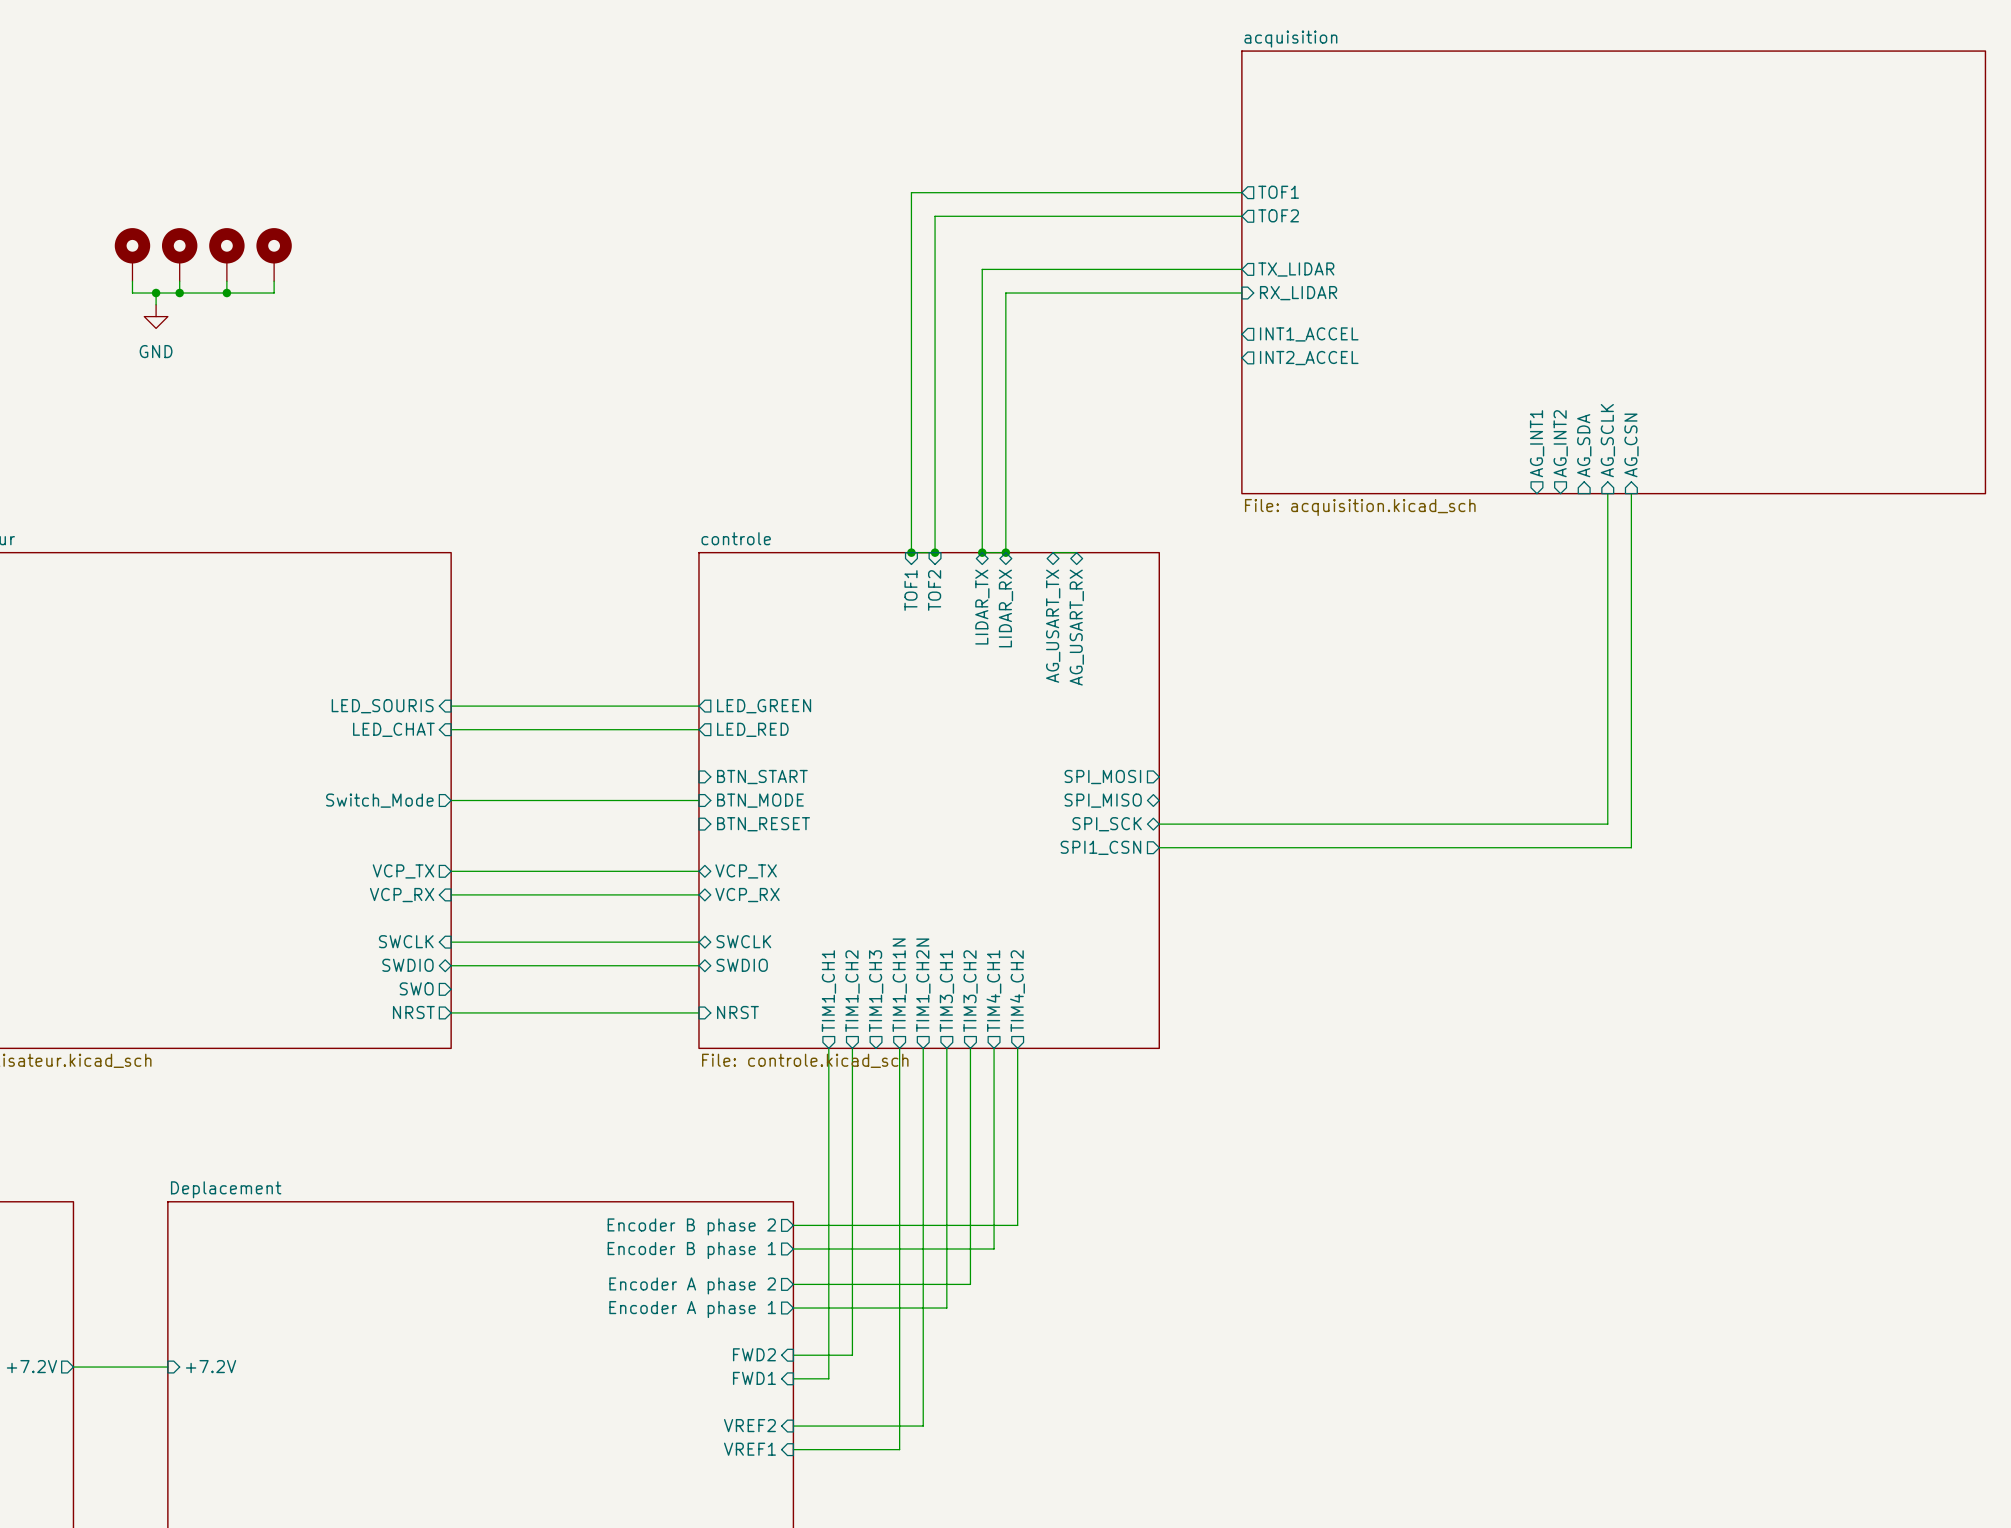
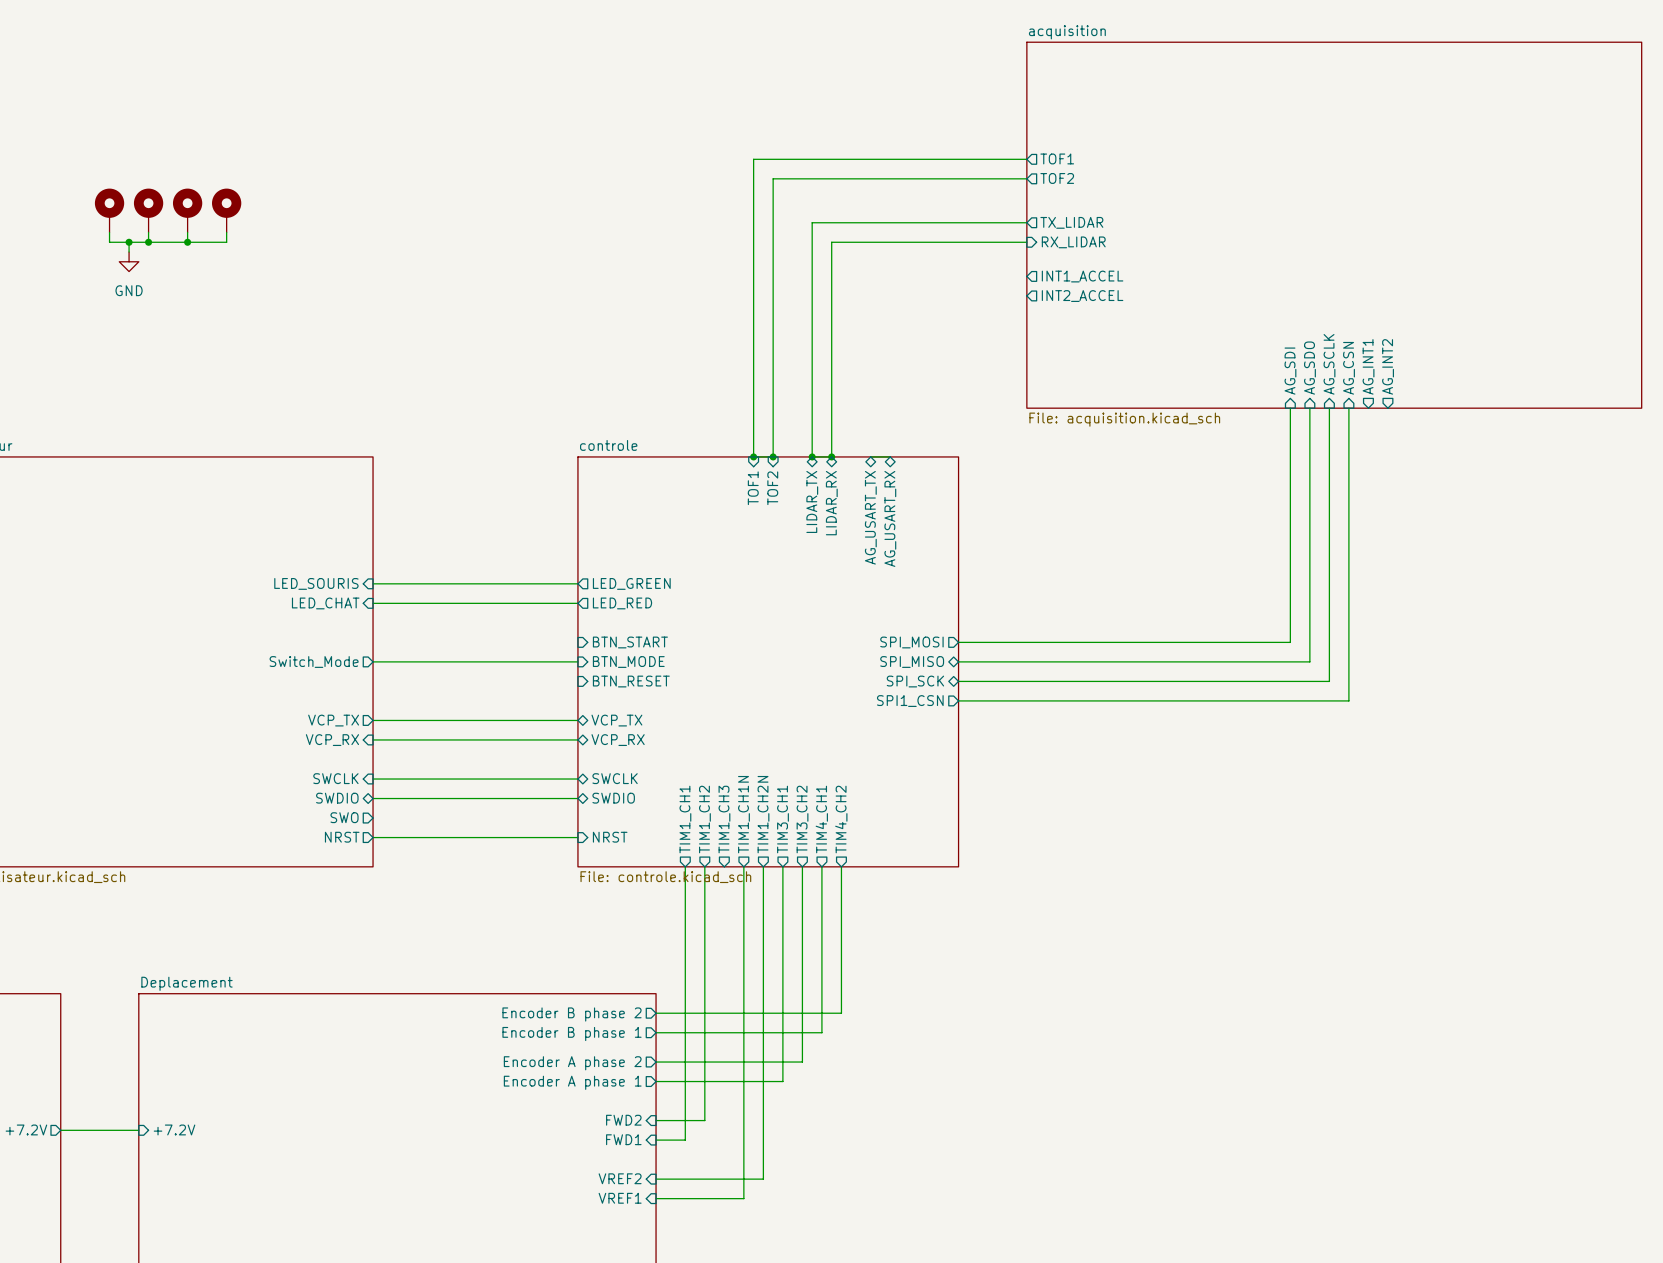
sheet pin position: AG_INT1 (1537, 443) -> AG_INT1 (1368, 366)
sheet pin shape: output (1560, 443) -> input (1290, 371)
sheet pin: AG_INT2 (1560, 443) -> AG_SDI (1290, 371)
sheet pin: none -> AG_INT2 (1388, 366)
sheet pin: AG_SDA (1584, 445) -> AG_SDO (1309, 368)
wire: none -> (1290, 408) (1290, 642) (958, 642)
wire: none -> (1309, 408) (1309, 661) (958, 661)

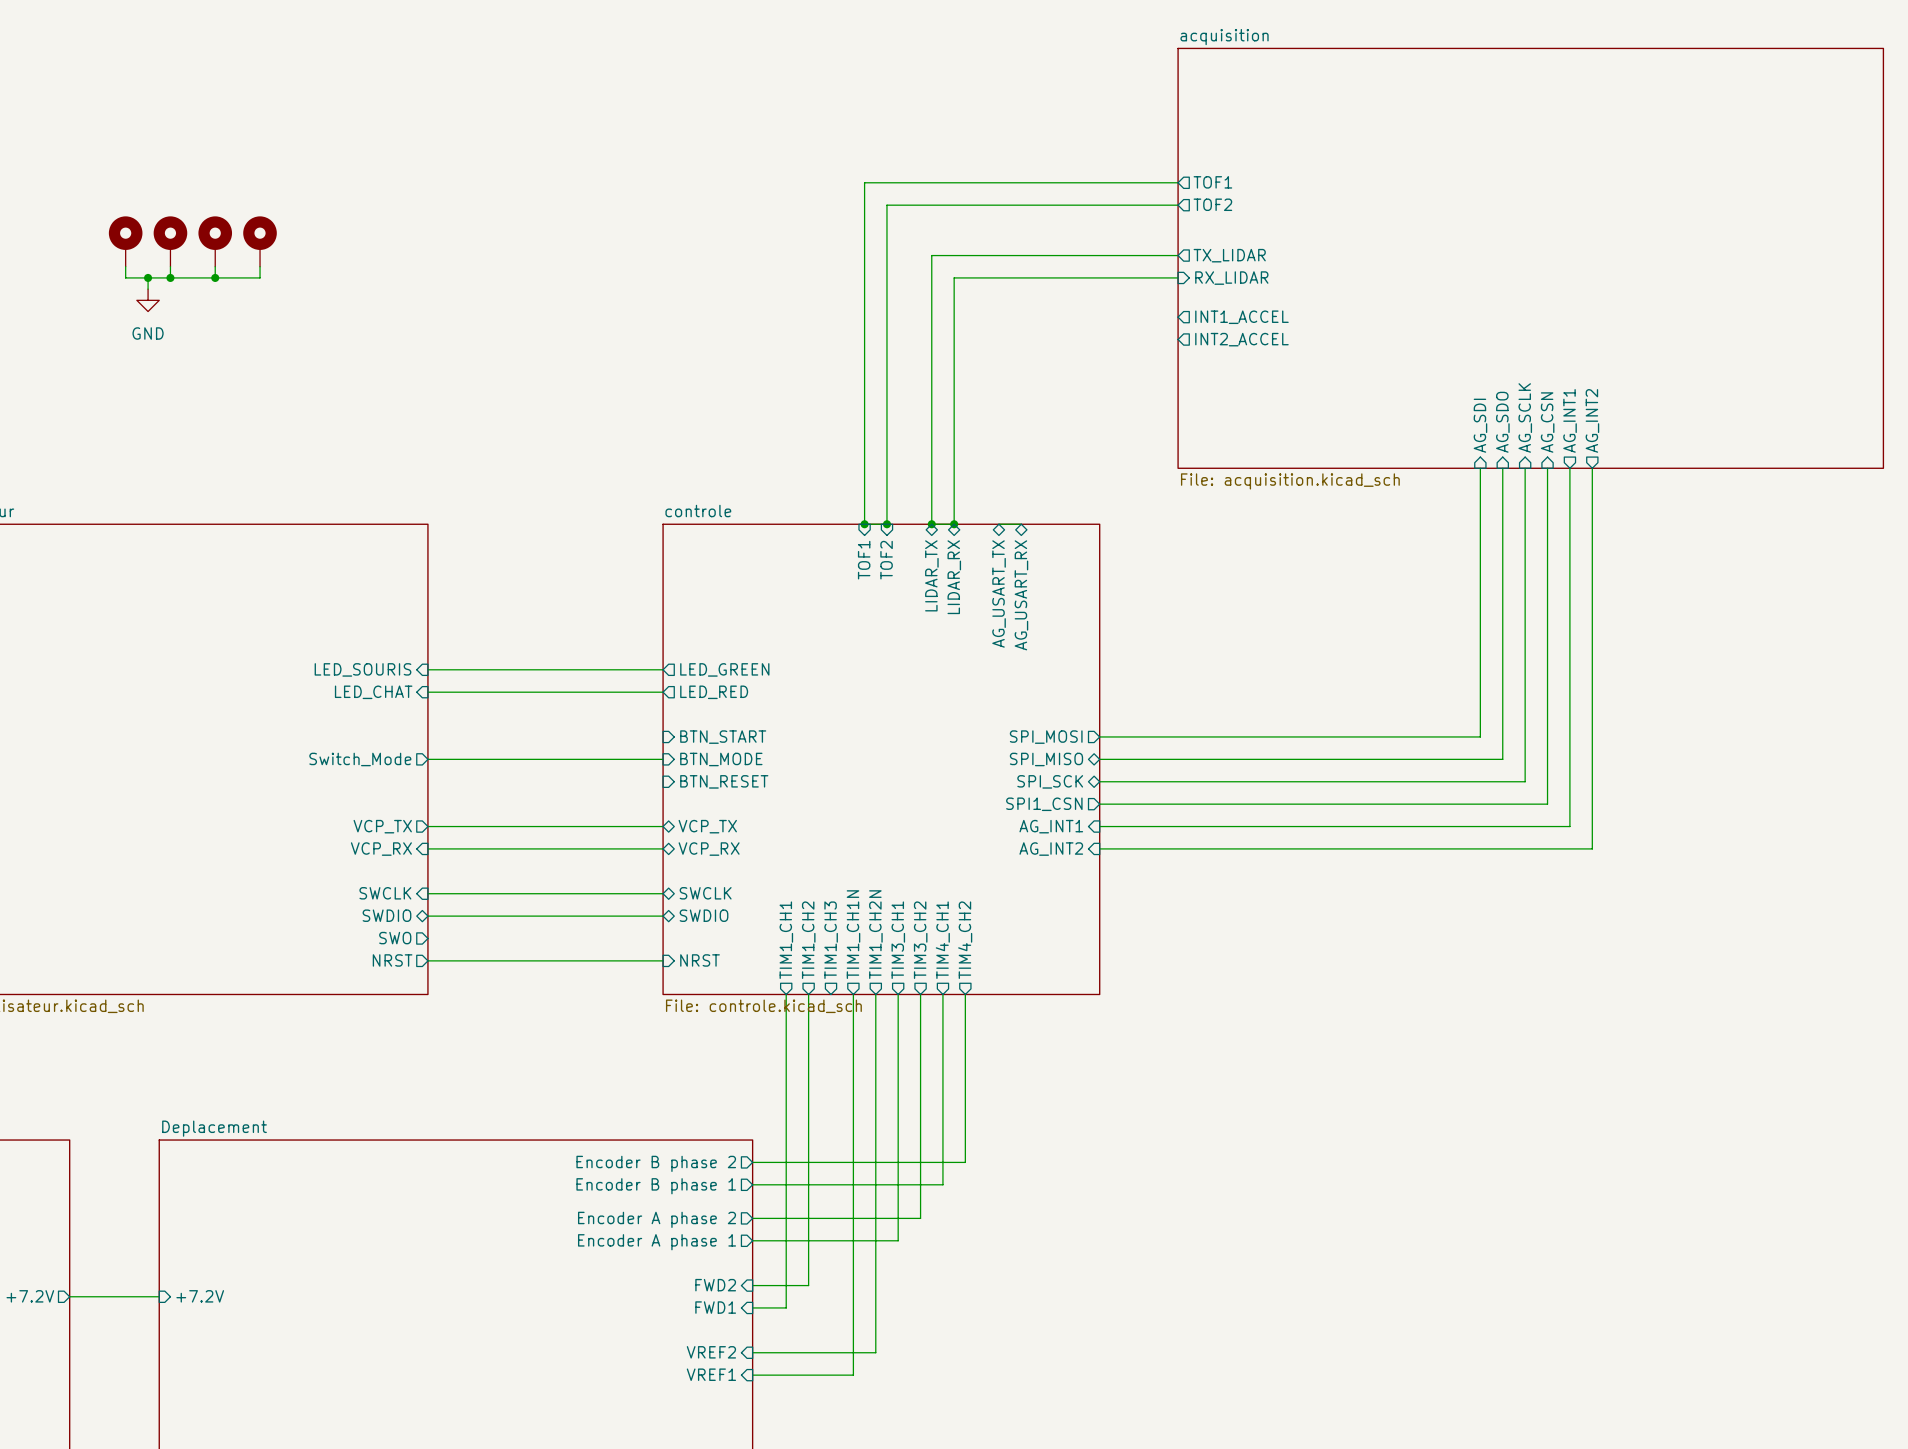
wire: none -> (1569, 468) (1569, 826) (1099, 826)
wire: none -> (1592, 468) (1592, 848) (1099, 848)
sheet pin: none -> AG_INT1 (1051, 826)
sheet pin: none -> AG_INT2 (1051, 849)

